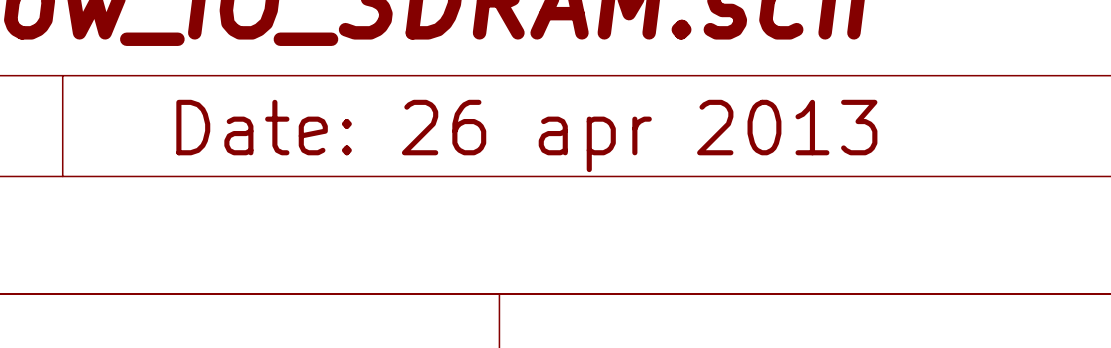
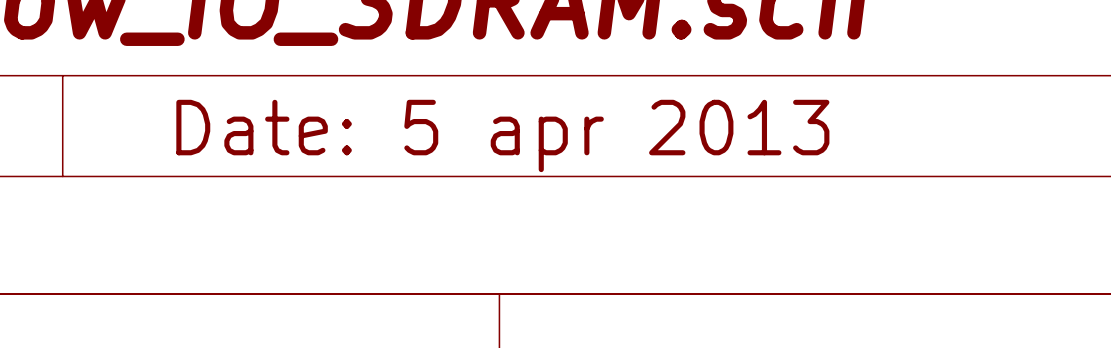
title block: Date: 26 apr 2013 (526, 135) -> Date: 5 apr 2013 (502, 135)

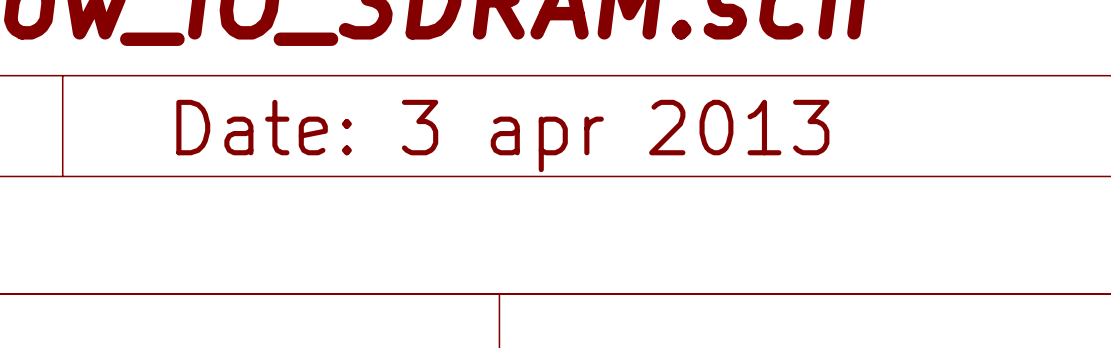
title block: Date: 5 apr 2013 (502, 135) -> Date: 3 apr 2013 (502, 135)

